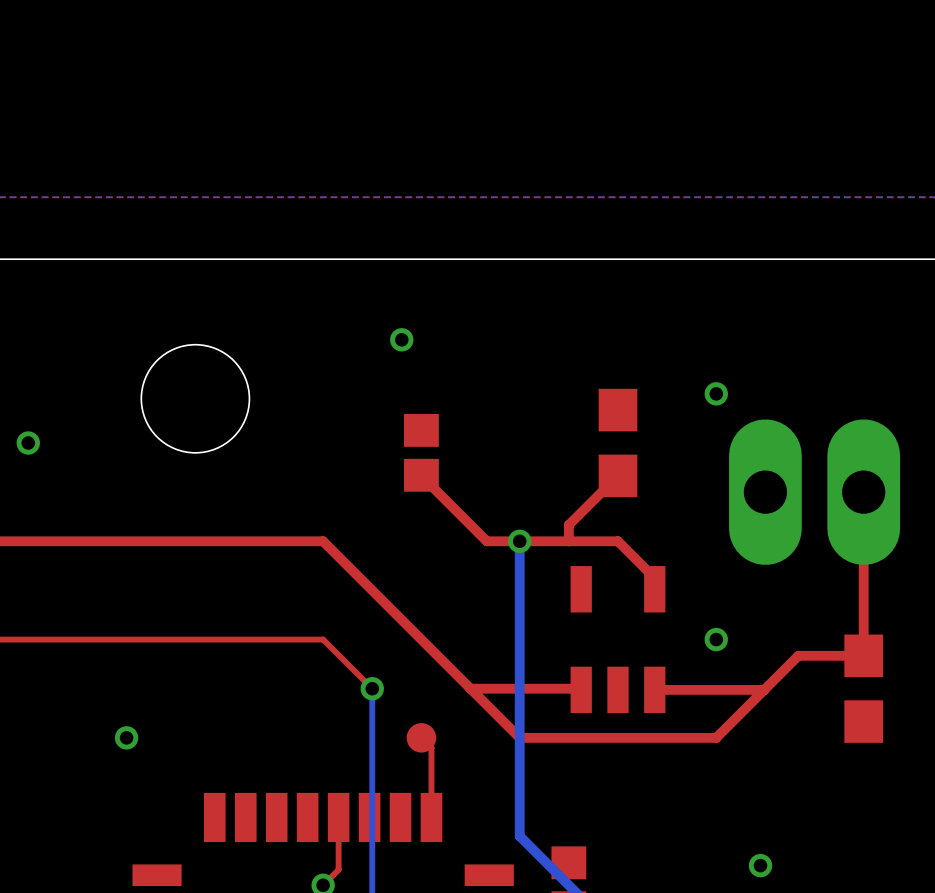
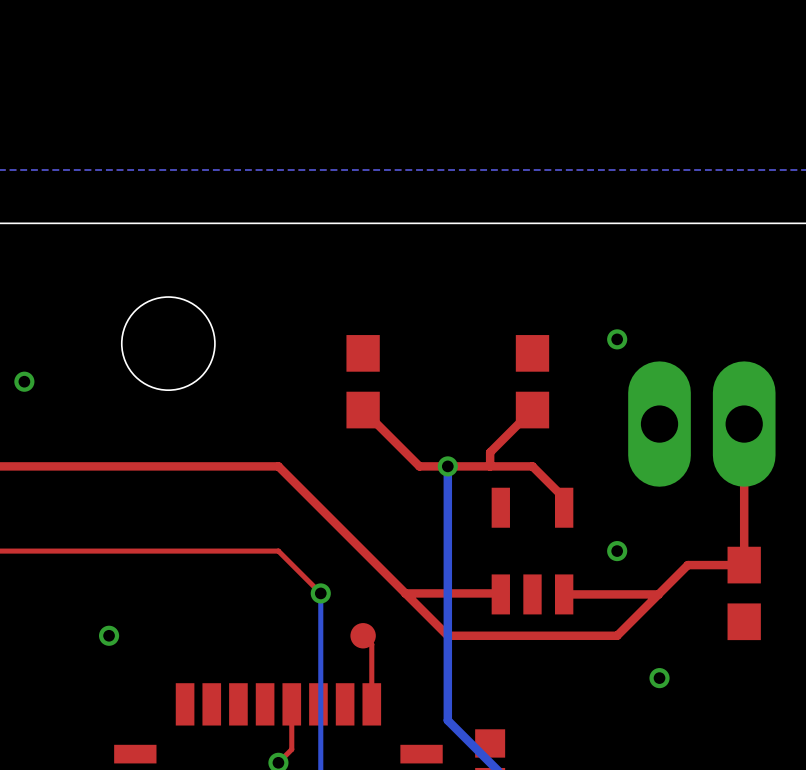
via: (401, 339) -> none
part footprint: [404, 413, 439, 492] -> [346, 335, 380, 429]
via position: (760, 865) -> (659, 678)

